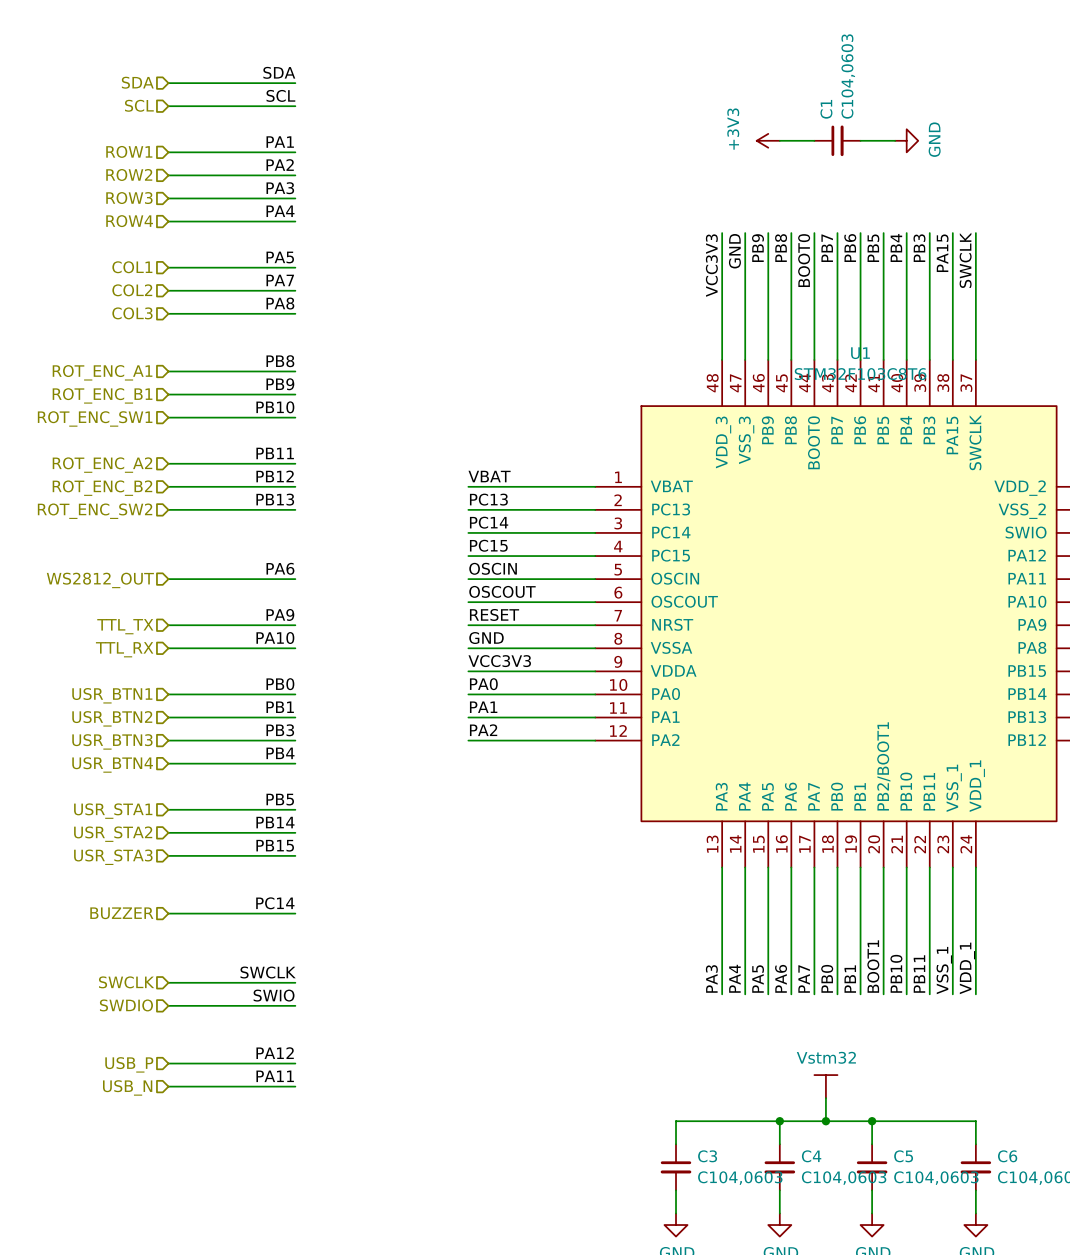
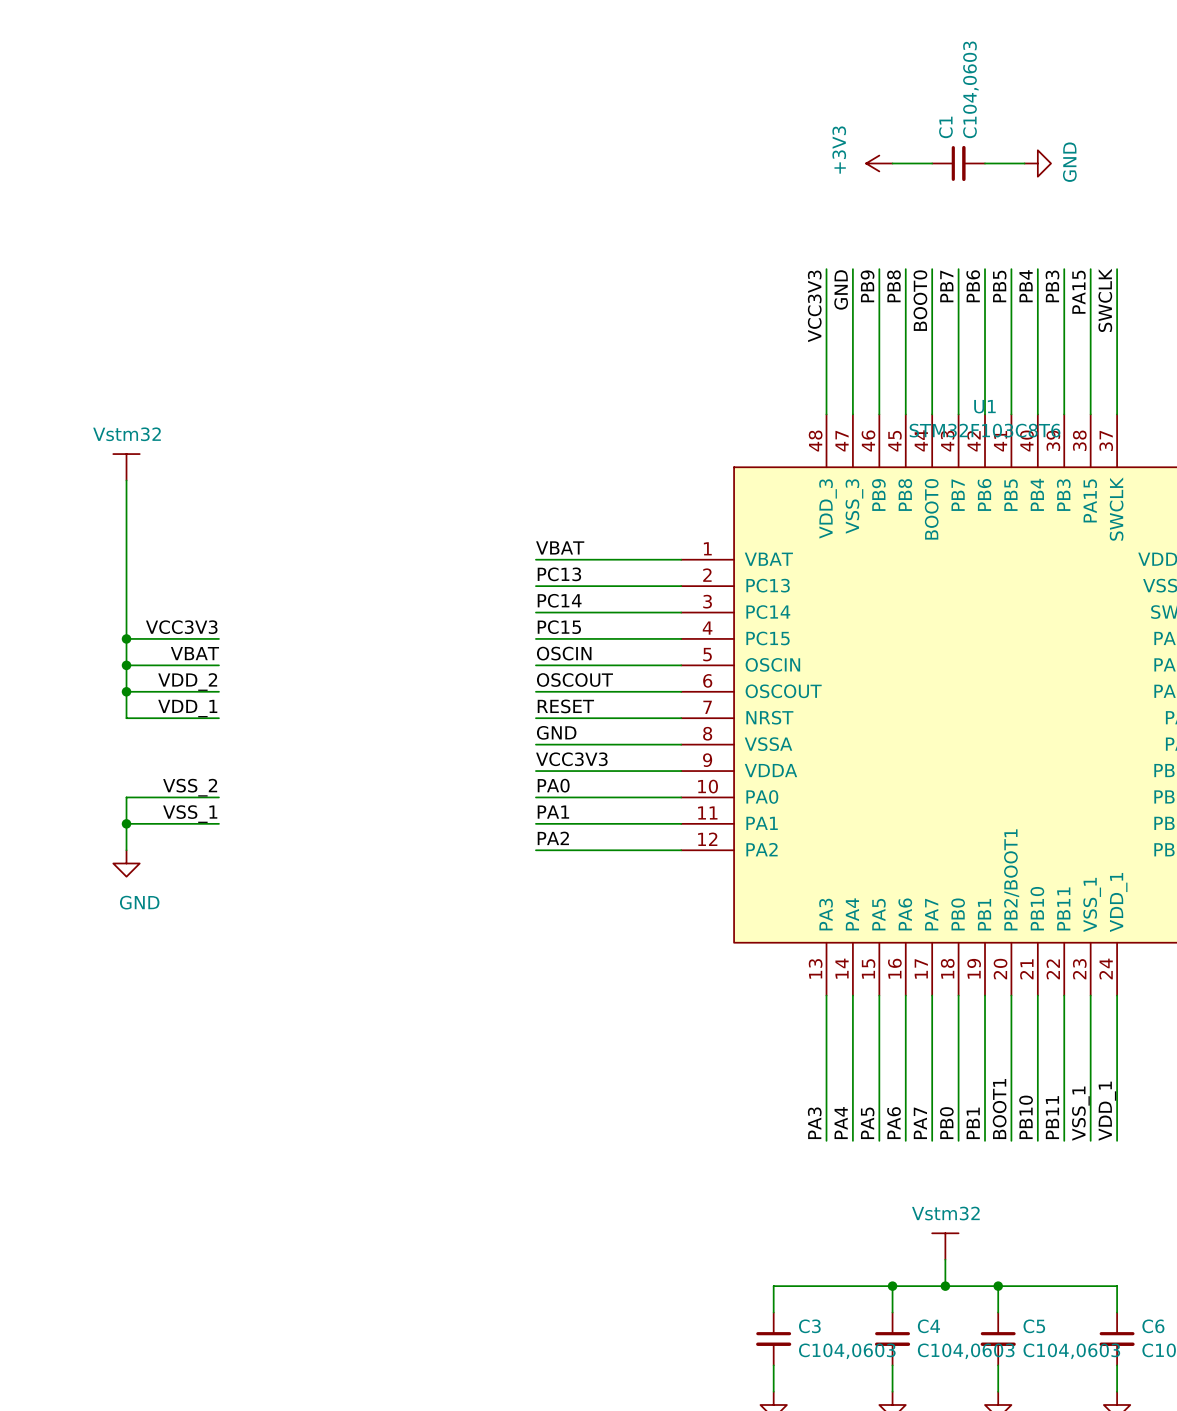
label: SDA (279, 72) -> none
hierarchical label: SDA (137, 82) -> none
wire: (168, 83) (295, 83) -> none
label: SCL (280, 95) -> none
hierarchical label: SCL (139, 105) -> none
wire: (168, 106) (295, 106) -> none
label: PA1 (280, 142) -> none
hierarchical label: ROW1 (129, 151) -> none
wire: (168, 152) (295, 152) -> none
label: PA2 (280, 165) -> none
hierarchical label: ROW2 (129, 174) -> none
wire: (168, 175) (295, 175) -> none
label: PA3 (280, 188) -> none
hierarchical label: ROW3 (129, 198) -> none
wire: (168, 198) (295, 198) -> none
label: PA4 (280, 211) -> none
hierarchical label: ROW4 (129, 221) -> none
wire: (168, 221) (295, 221) -> none
label: PA5 (280, 257) -> none
hierarchical label: COL1 (132, 267) -> none
wire: (168, 267) (295, 267) -> none
label: PA7 (280, 280) -> none
hierarchical label: COL2 (132, 290) -> none
wire: (168, 290) (295, 290) -> none
label: PA8 (280, 303) -> none
hierarchical label: COL3 (132, 313) -> none
wire: (168, 313) (295, 313) -> none
label: PB8 (280, 361) -> none
wire: (168, 371) (295, 371) -> none
hierarchical label: ROT_ENC_A1 (102, 372) -> none
label: PB9 (280, 384) -> none
wire: (168, 394) (295, 394) -> none
hierarchical label: ROT_ENC_B1 (102, 395) -> none
power symbol: none -> Vstm32 (126, 467)
label: PB10 (275, 407) -> none
wire: none -> (126, 480) (126, 718) (192, 718)
wire: (168, 417) (295, 417) -> none
hierarchical label: ROT_ENC_SW1 (95, 418) -> none
label: PB11 (275, 453) -> none
wire: (168, 463) (295, 463) -> none
hierarchical label: ROT_ENC_A2 (102, 465) -> none
label: PB12 (275, 476) -> none
wire: (168, 486) (295, 486) -> none
hierarchical label: ROT_ENC_B2 (102, 488) -> none
label: PB13 (275, 499) -> none
wire: (168, 509) (295, 509) -> none
hierarchical label: ROT_ENC_SW2 (95, 511) -> none
label: none -> VCC3V3 (181, 627)
wire: none -> (126, 638) (218, 638)
junction: none -> (126, 638)
label: none -> VBAT (194, 653)
label: PA6 (280, 568) -> none
wire: none -> (126, 665) (192, 665)
junction: none -> (126, 665)
wire: (191, 579) (295, 579) -> none
hierarchical label: WS2812_OUT (100, 580) -> none
label: none -> VDD_2 (187, 682)
wire: none -> (126, 691) (218, 691)
junction: none -> (126, 691)
label: PA9 (280, 614) -> none
label: none -> VDD_1 (187, 708)
wire: (191, 625) (295, 625) -> none
hierarchical label: TTL_TX (125, 626) -> none
label: PA10 (275, 638) -> none
wire: (168, 648) (295, 648) -> none
hierarchical label: TTL_RX (124, 649) -> none
label: PB0 (280, 684) -> none
label: none -> VSS_2 (190, 787)
wire: none -> (192, 797) (126, 797) (126, 850)
wire: (191, 694) (295, 694) -> none
hierarchical label: USR_BTN1 (112, 695) -> none
label: PB1 (280, 707) -> none
label: none -> VSS_1 (190, 814)
wire: none -> (126, 823) (192, 823)
junction: none -> (126, 823)
wire: (191, 717) (295, 717) -> none
hierarchical label: USR_BTN2 (112, 718) -> none
label: PB3 (280, 730) -> none
wire: (168, 740) (295, 740) -> none
hierarchical label: USR_BTN3 (112, 741) -> none
power symbol: none -> GND (126, 863)
label: PB4 (280, 753) -> none
wire: (168, 763) (295, 763) -> none
hierarchical label: USR_BTN4 (112, 764) -> none
label: PB5 (280, 799) -> none
wire: (168, 809) (295, 809) -> none
hierarchical label: USR_STA1 (113, 811) -> none
label: PB14 (275, 822) -> none
wire: (168, 832) (295, 832) -> none
hierarchical label: USR_STA2 (113, 834) -> none
label: PB15 (275, 845) -> none
wire: (168, 855) (295, 855) -> none
hierarchical label: USR_STA3 (113, 857) -> none
label: PC14 (275, 903) -> none
hierarchical label: BUZZER (121, 913) -> none
wire: (168, 913) (295, 913) -> none
label: SWCLK (268, 972) -> none
hierarchical label: SWCLK (126, 982) -> none
wire: (168, 982) (295, 982) -> none
label: SWIO (274, 995) -> none
hierarchical label: SWDIO (126, 1005) -> none
wire: (168, 1005) (295, 1005) -> none
label: PA12 (275, 1053) -> none
wire: (168, 1063) (295, 1063) -> none
hierarchical label: USB_P (129, 1064) -> none
label: PA11 (275, 1076) -> none
wire: (168, 1086) (295, 1086) -> none
hierarchical label: USB_N (127, 1087) -> none

